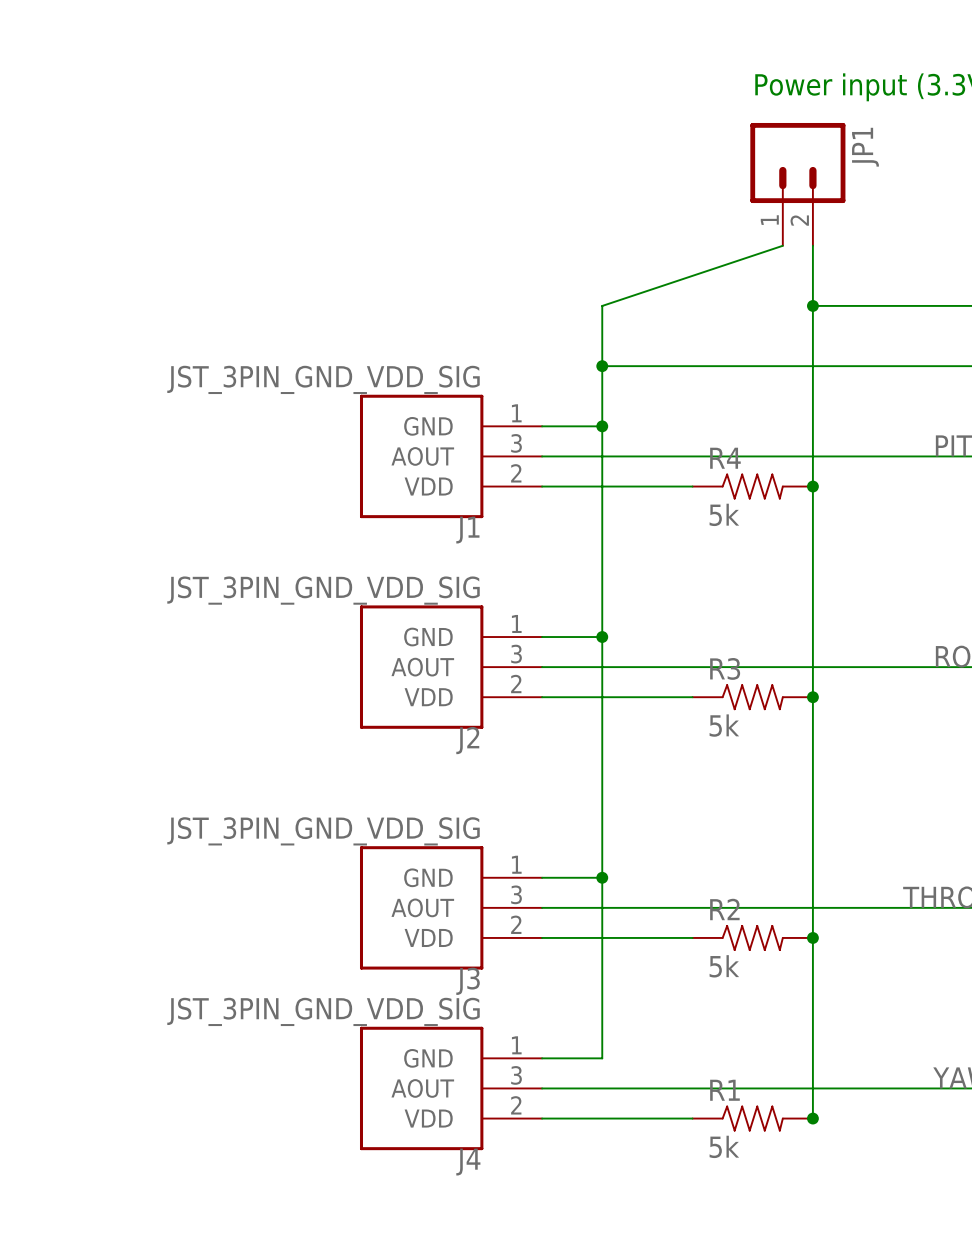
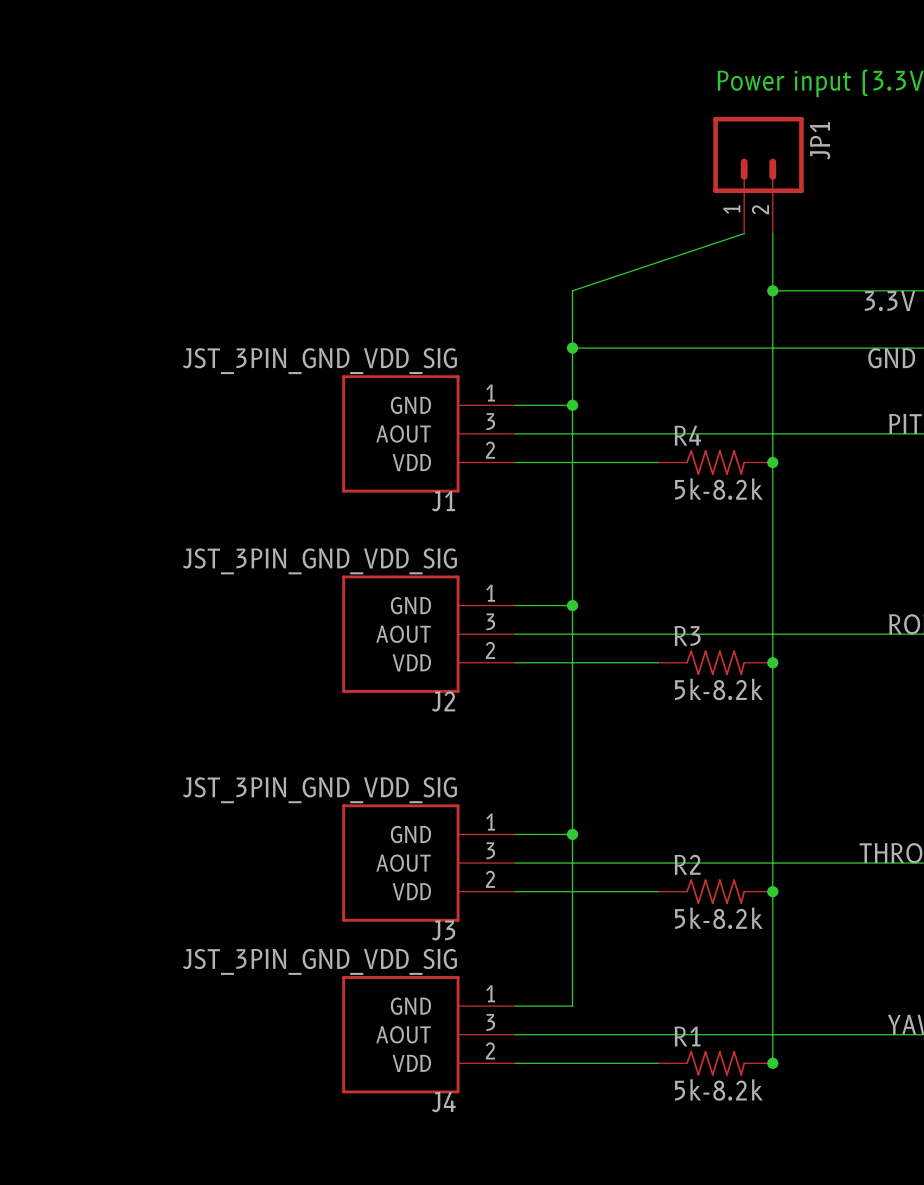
label: none -> 3.3V (889, 301)
label: none -> GND (891, 358)
R4 value: 5k (724, 514) -> 5k-8.2k (718, 489)
R3 value: 5k (724, 725) -> 5k-8.2k (718, 689)
R2 value: 5k (724, 966) -> 5k-8.2k (718, 918)
R1 value: 5k (724, 1146) -> 5k-8.2k (718, 1089)

